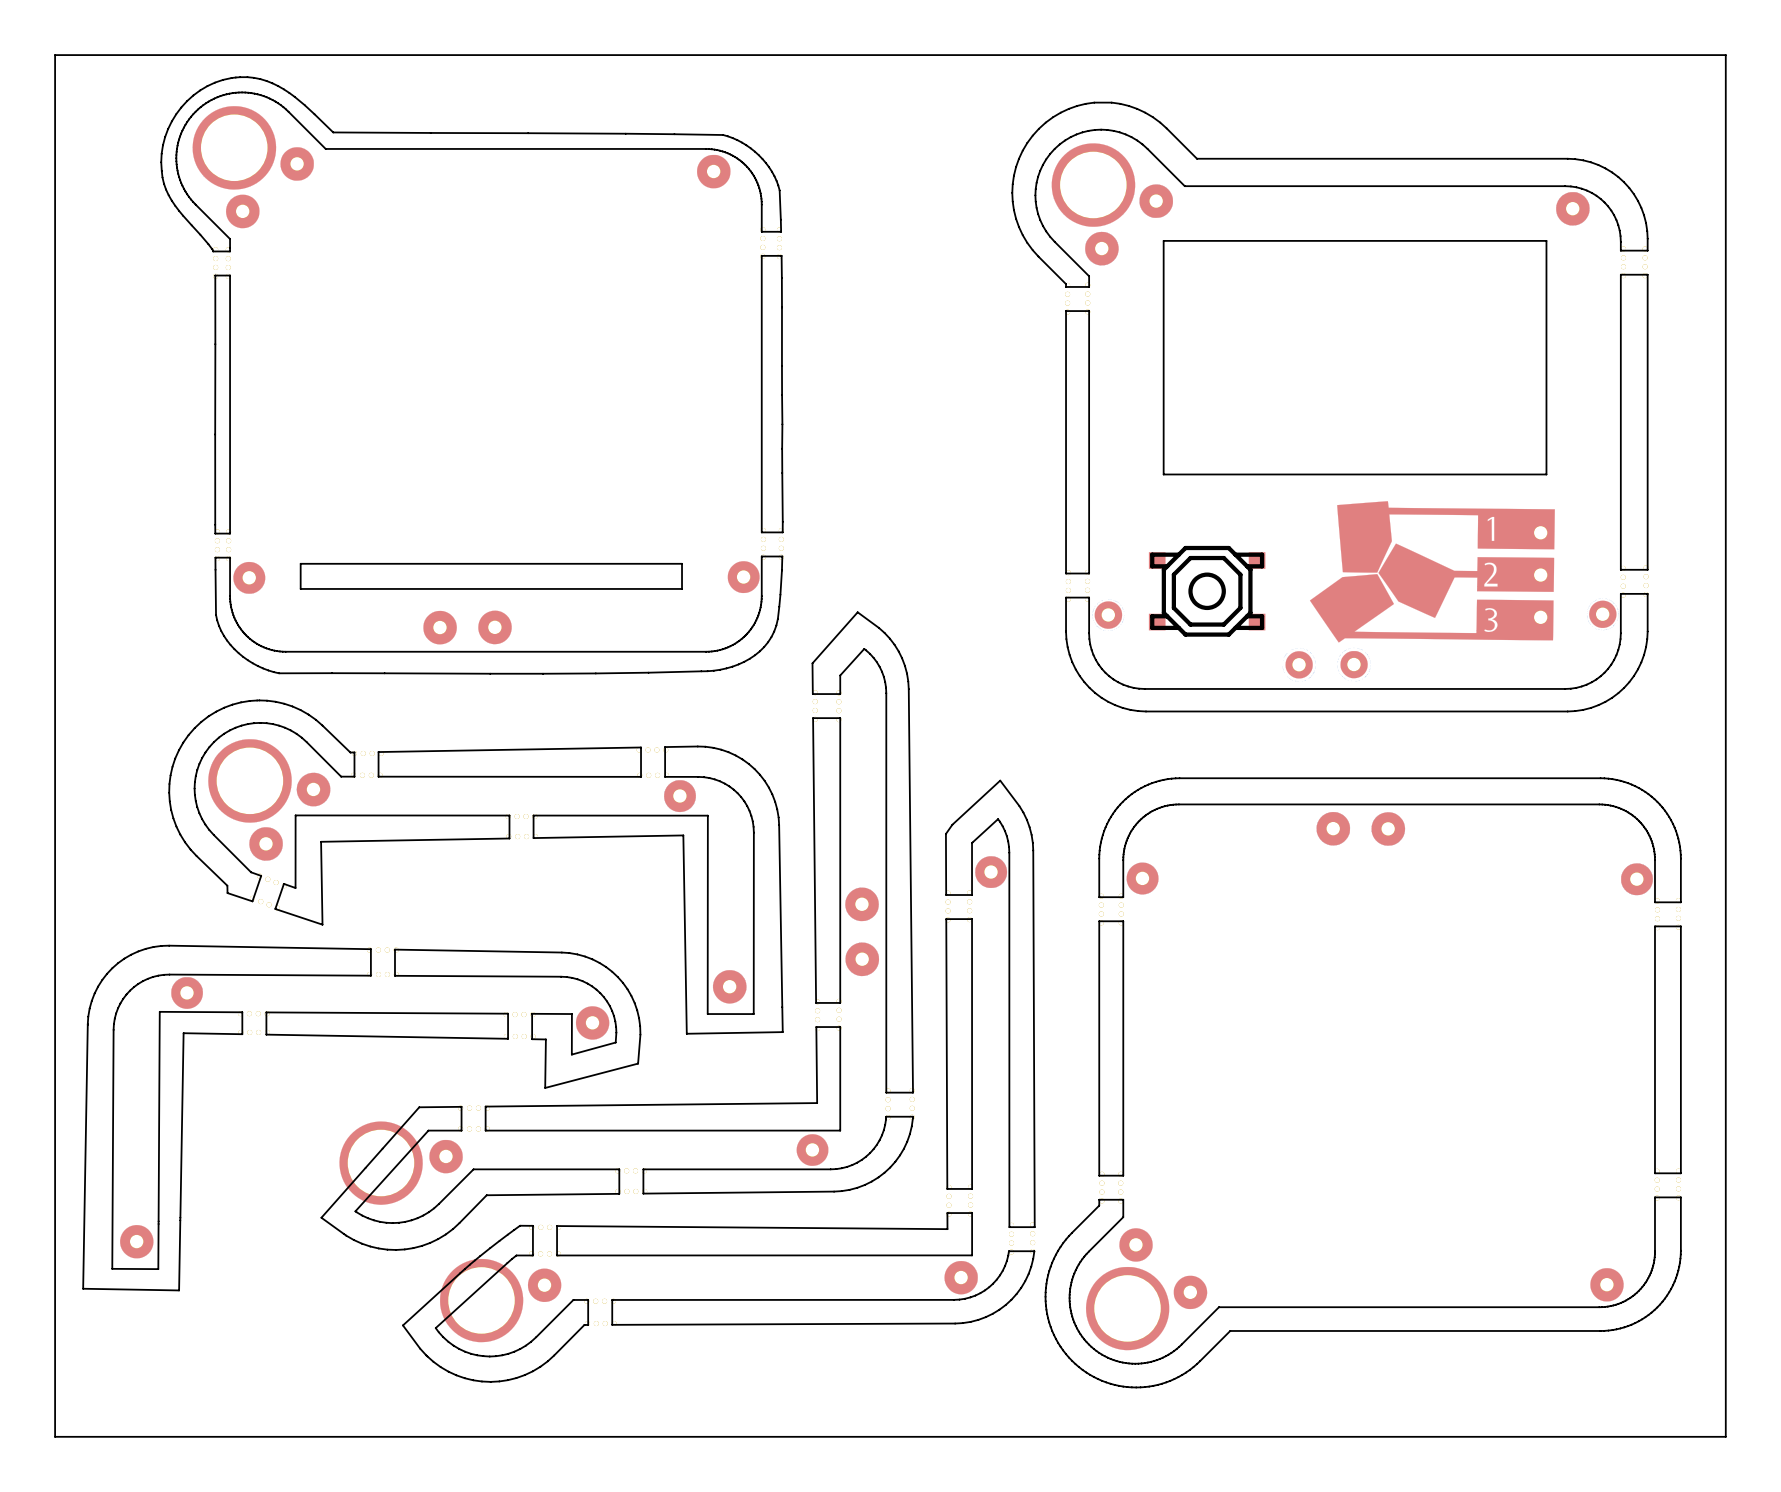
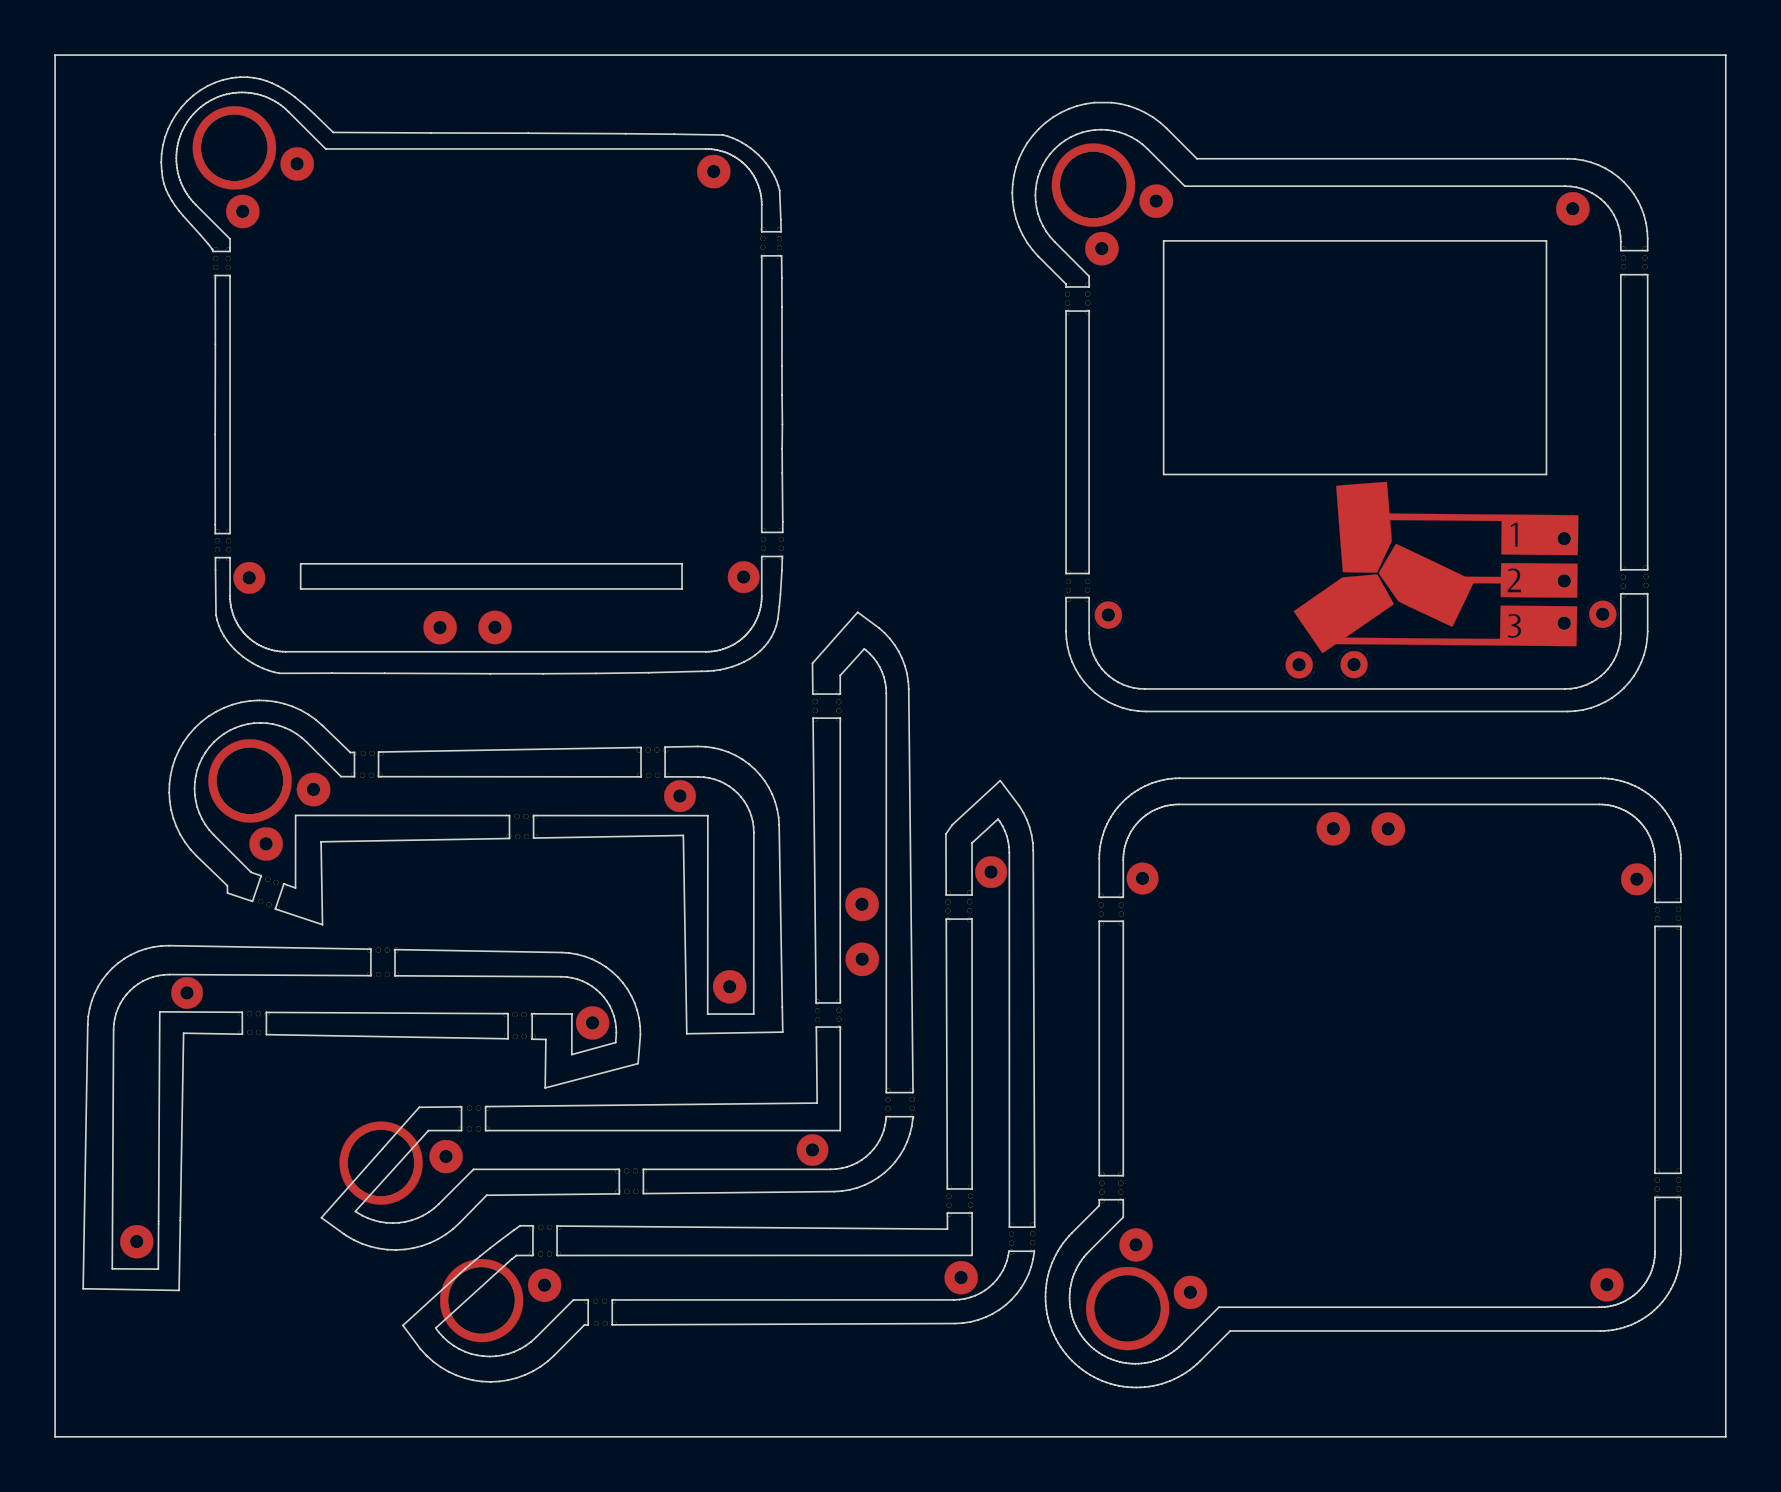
part footprint: [1309, 501, 1555, 643] -> [1293, 481, 1579, 654]
part: (1207, 591) -> none

